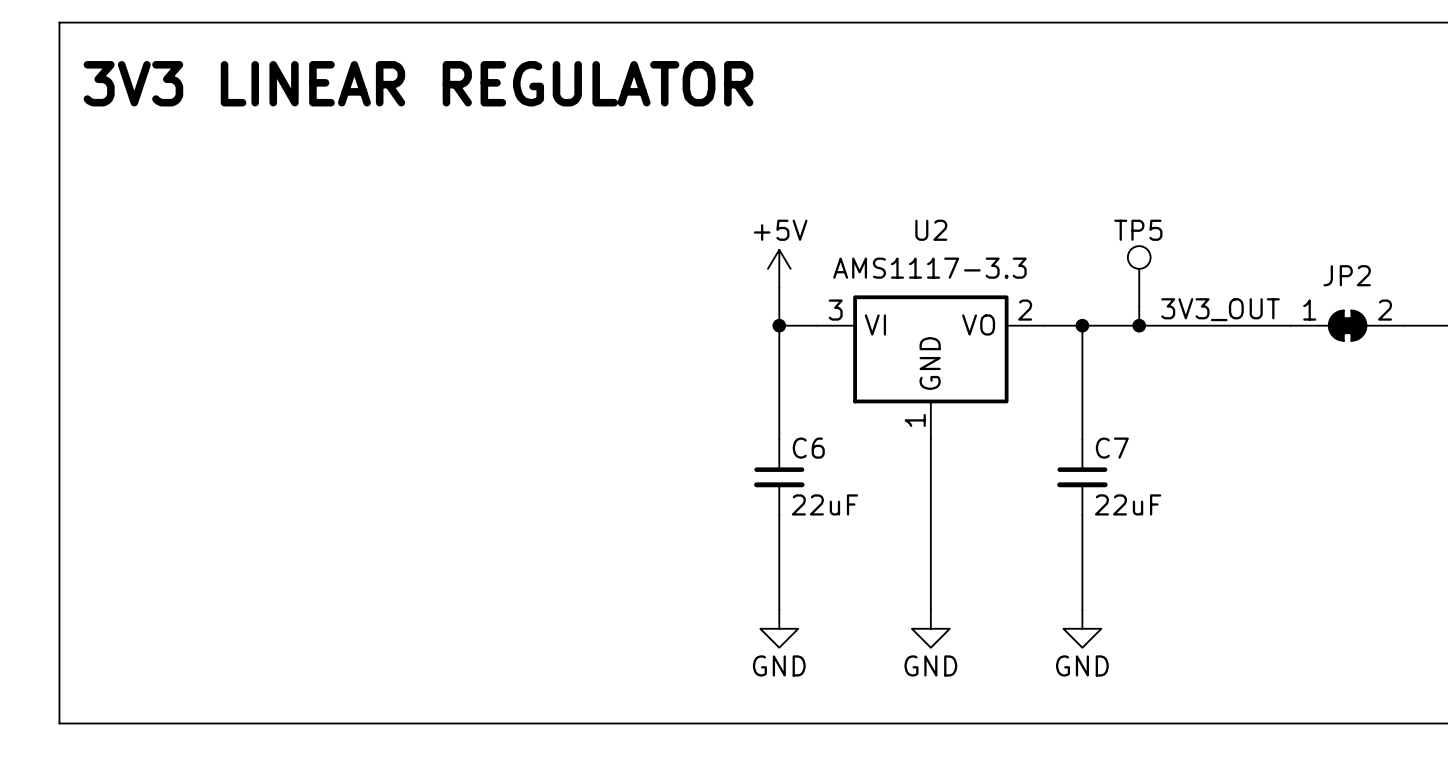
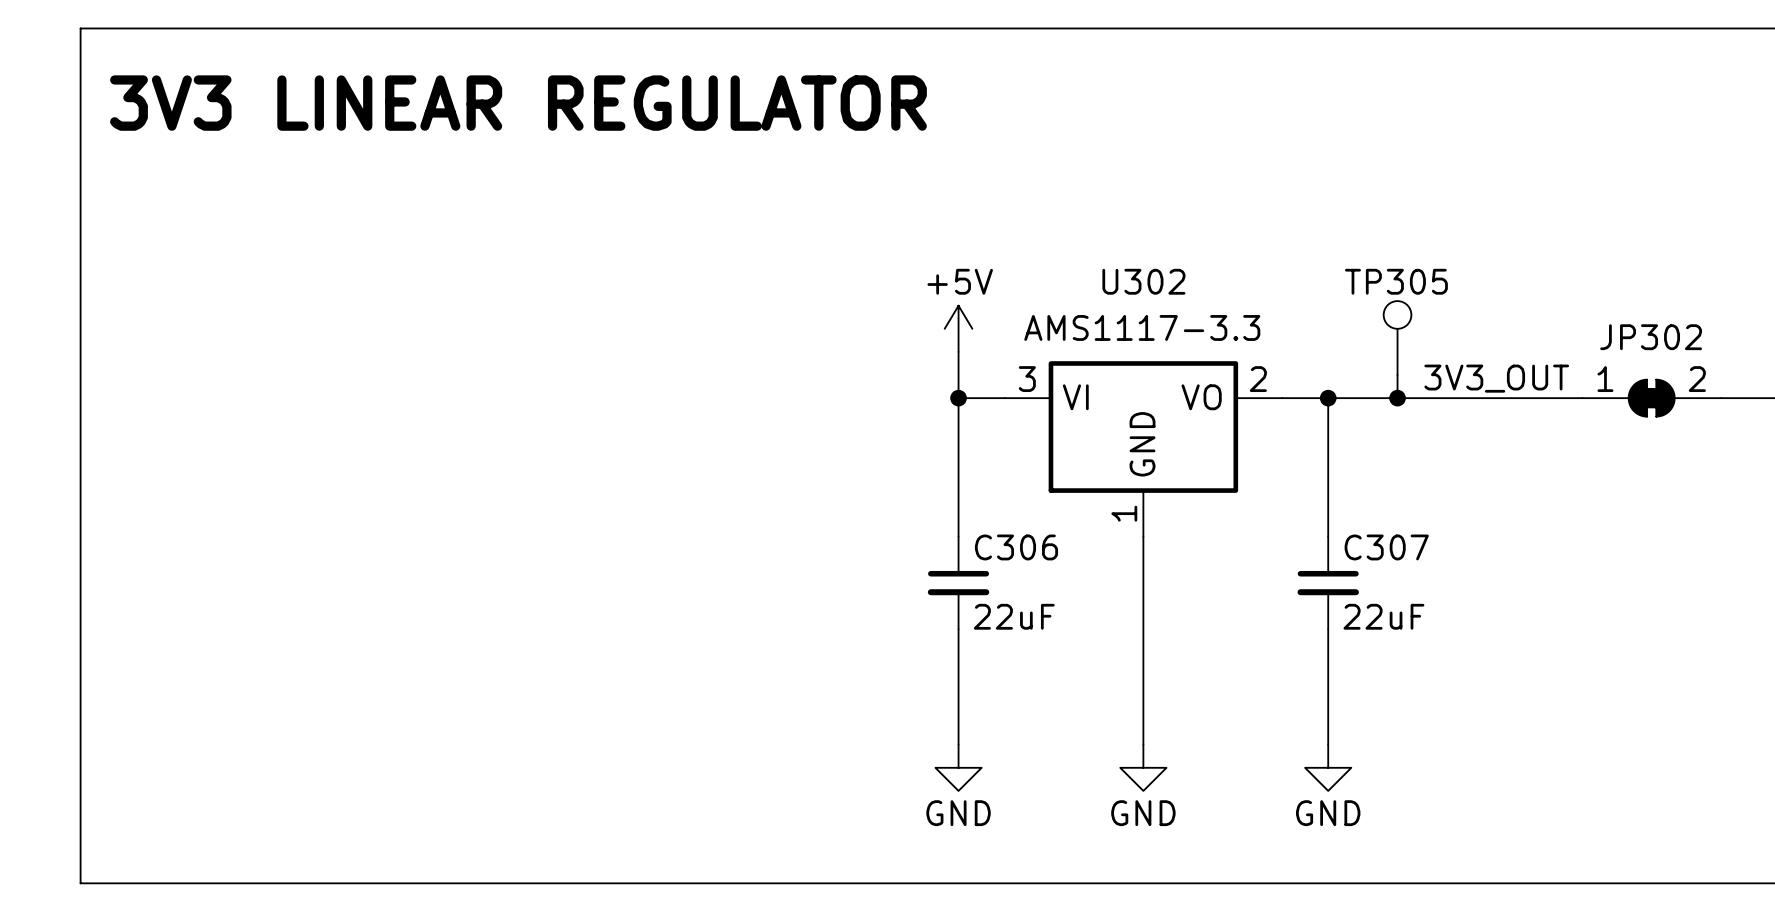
U2 name: U2 (931, 230) -> U302 (1143, 281)
TP5 name: TP5 (1138, 230) -> TP305 (1396, 281)
JP2 name: JP2 (1347, 275) -> JP302 (1651, 337)
C6 name: C6 (808, 448) -> C306 (1016, 547)
C7 name: C7 (1112, 448) -> C307 (1386, 547)

